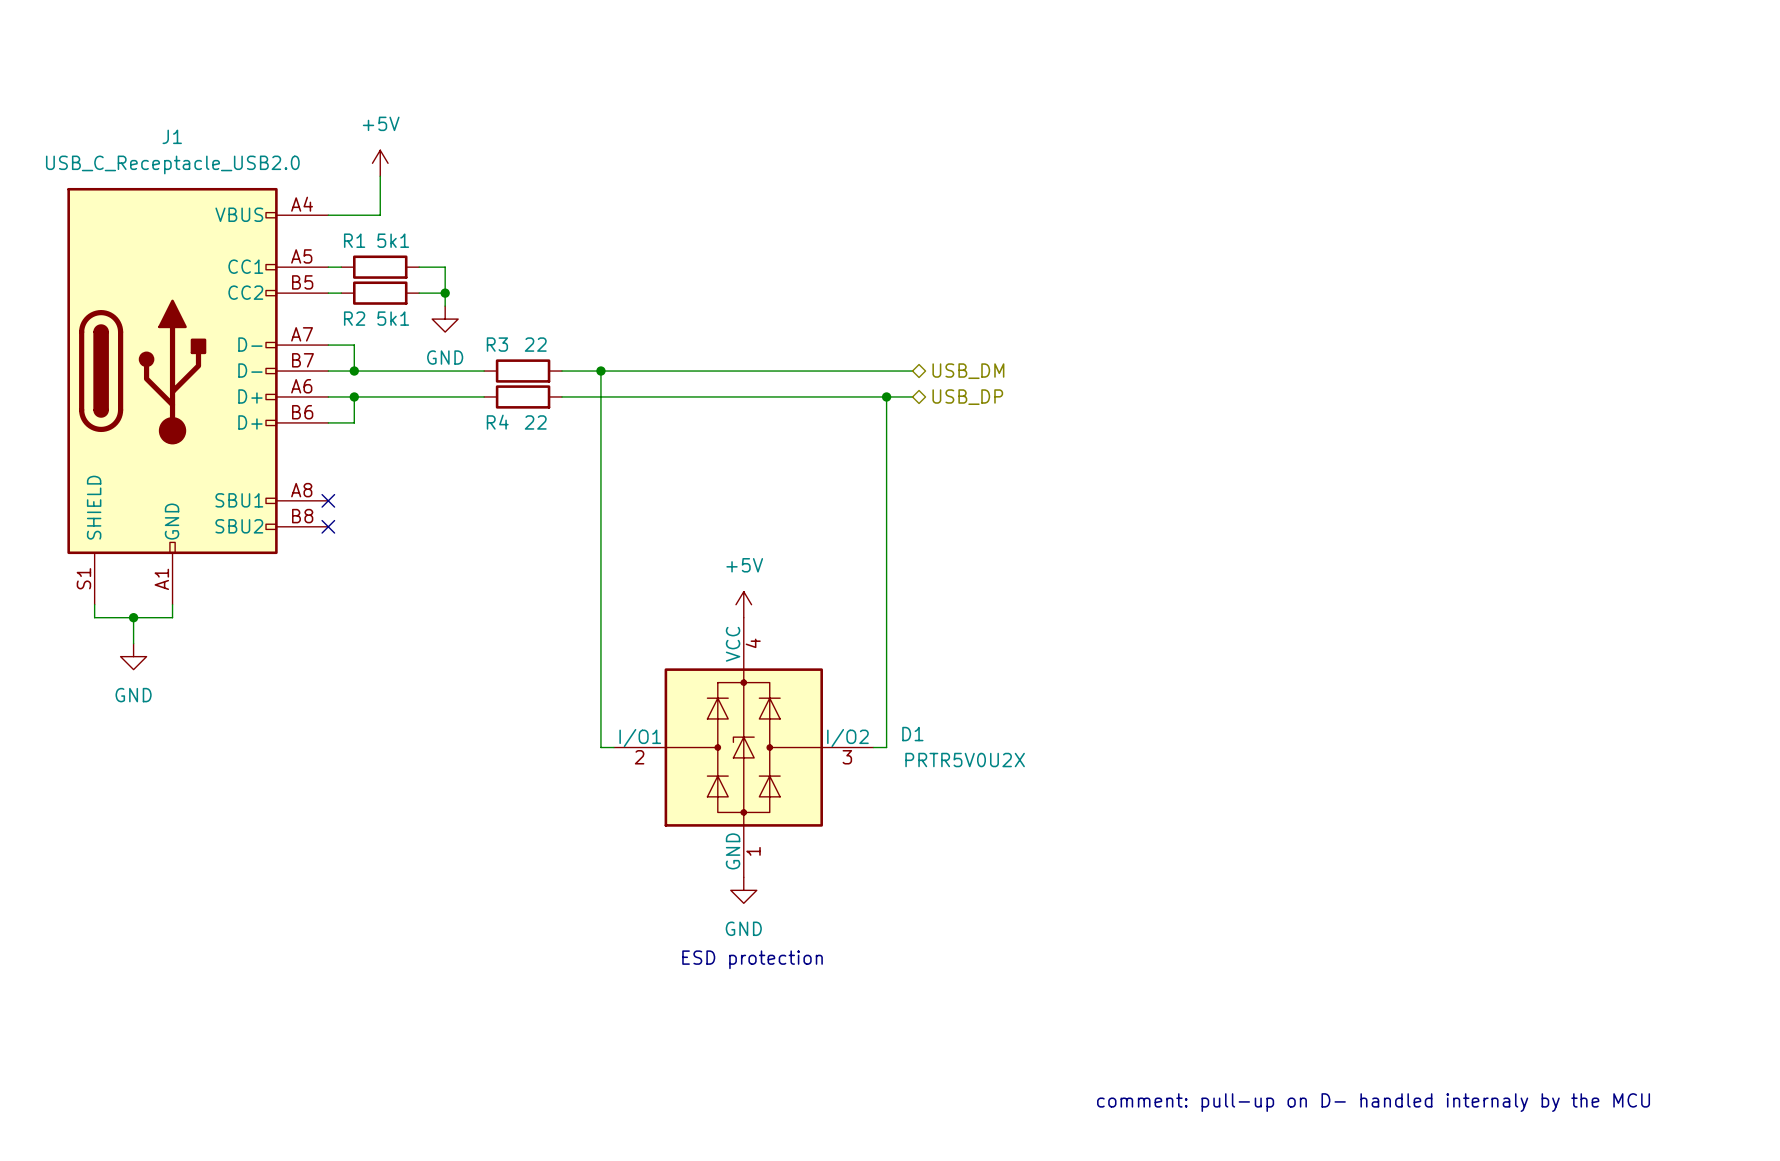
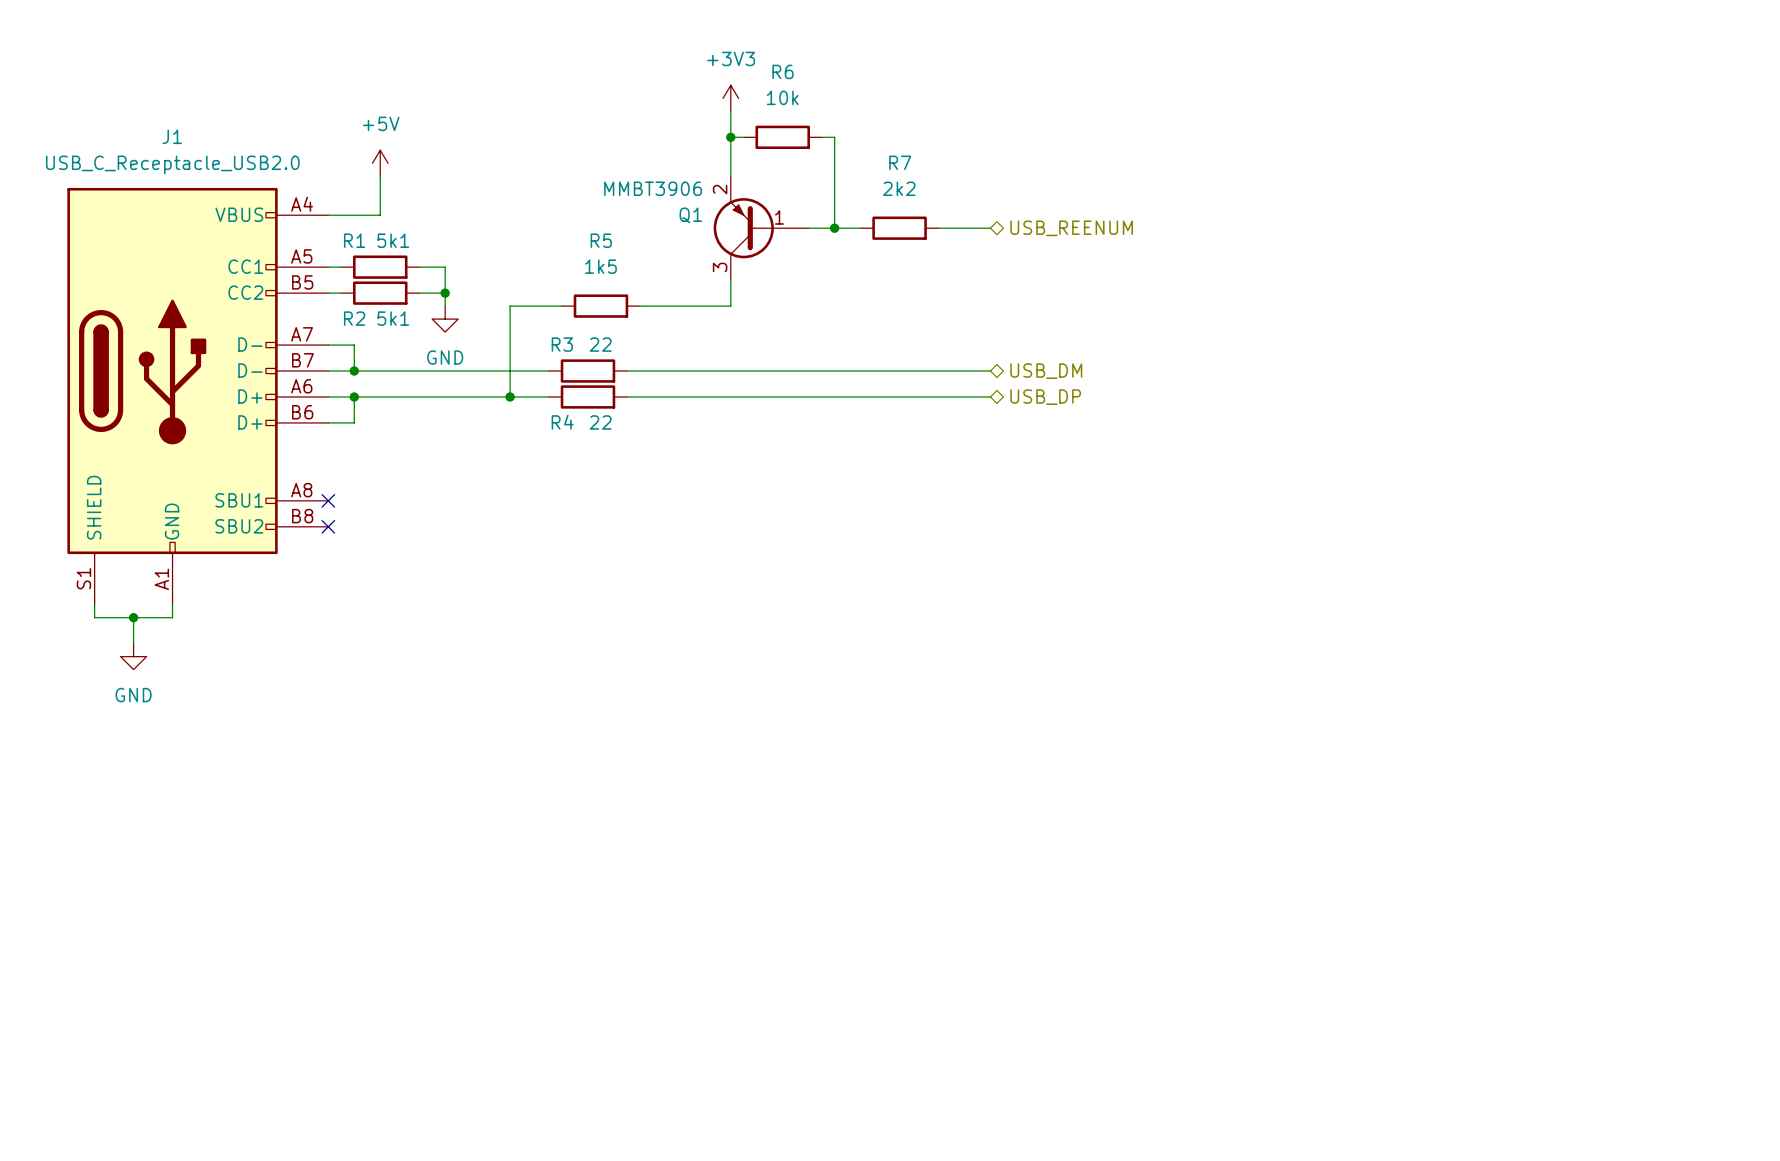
power symbol: none -> +3V3 (730, 98)
wire: none -> (730, 111) (730, 176)
wire: none -> (730, 137) (743, 137)
junction: none -> (730, 137)
R6: none -> 10k (782, 137)
wire: none -> (821, 137) (834, 137) (834, 228)
Q1: none -> MMBT3906 (761, 228)
wire: none -> (808, 228) (860, 228)
junction: none -> (834, 228)
R7: none -> 2k2 (899, 228)
wire: none -> (938, 228) (990, 228)
hierarchical label: none -> USB_REENUM (1071, 228)
wire: none -> (730, 280) (730, 306) (639, 306)
wire: none -> (562, 306) (510, 306) (510, 396)
R5: none -> 1k5 (600, 306)
R3 position: (523, 371) -> (587, 371)
wire: (562, 371) (626, 371) -> (484, 371) (549, 371)
wire: (600, 371) (600, 747) (613, 747) -> none
junction: (600, 371) -> none
wire: none -> (912, 371) (990, 371)
hierarchical label position: USB_DM (968, 371) -> USB_DM (1046, 371)
junction: none -> (510, 396)
R4 position: (523, 396) -> (587, 396)
wire: (562, 396) (626, 396) -> (484, 396) (549, 396)
wire: (886, 396) (886, 747) (873, 747) -> none
junction: (886, 396) -> none
wire: none -> (912, 396) (990, 396)
hierarchical label position: USB_DP (967, 397) -> USB_DP (1045, 397)
power symbol: +5V (743, 604) -> none
D1: PRTR5V0U2X (743, 747) -> none
power symbol: GND (743, 890) -> none
text: ESD protection (752, 959) -> none
text: comment: pull-up on D- handled internaly by the MCU (1373, 1102) -> none

